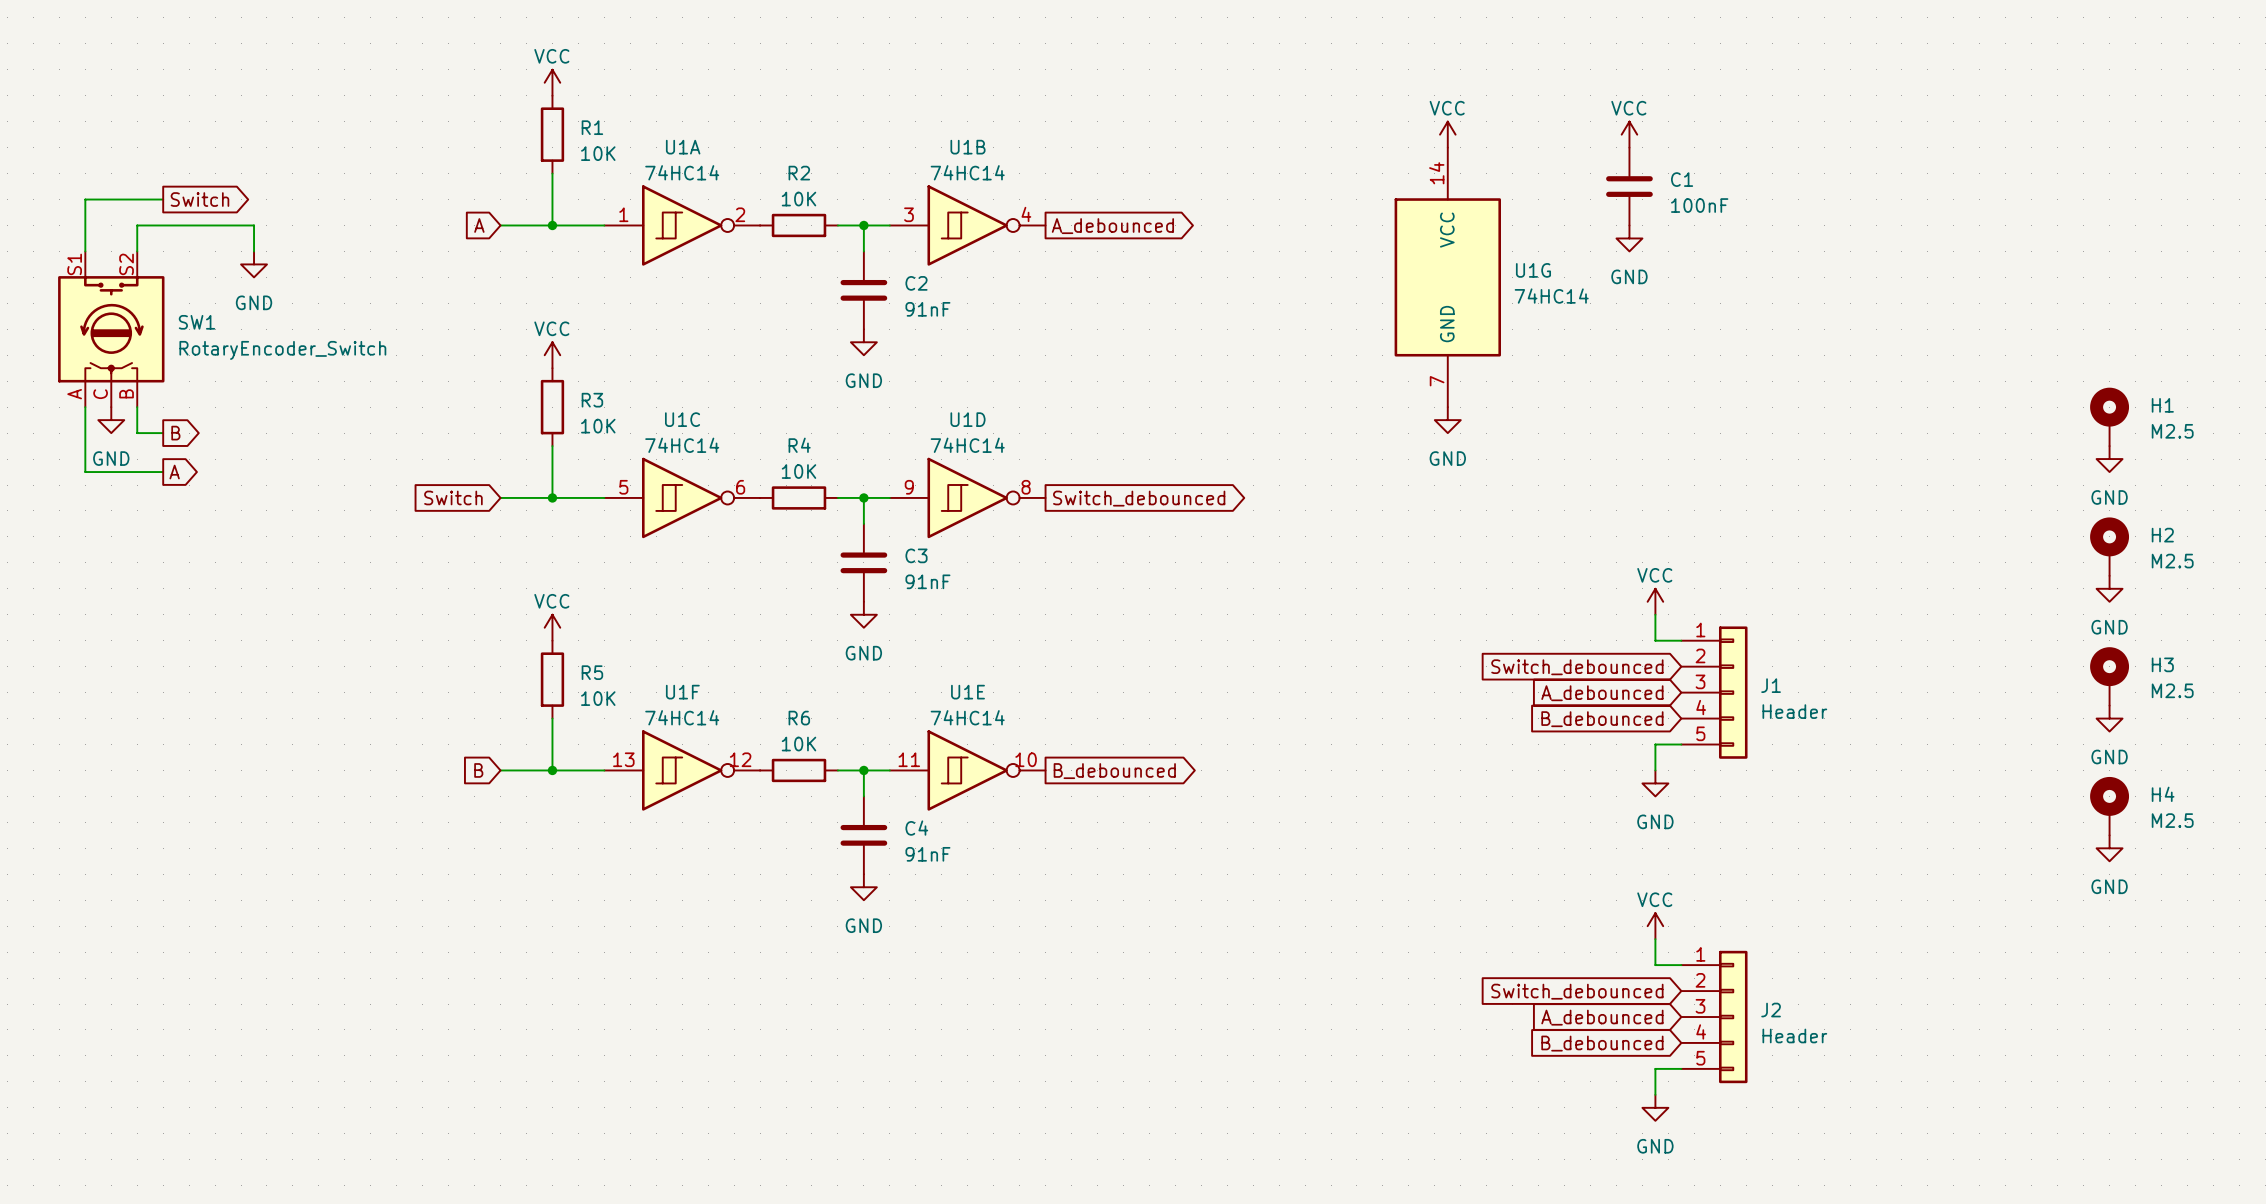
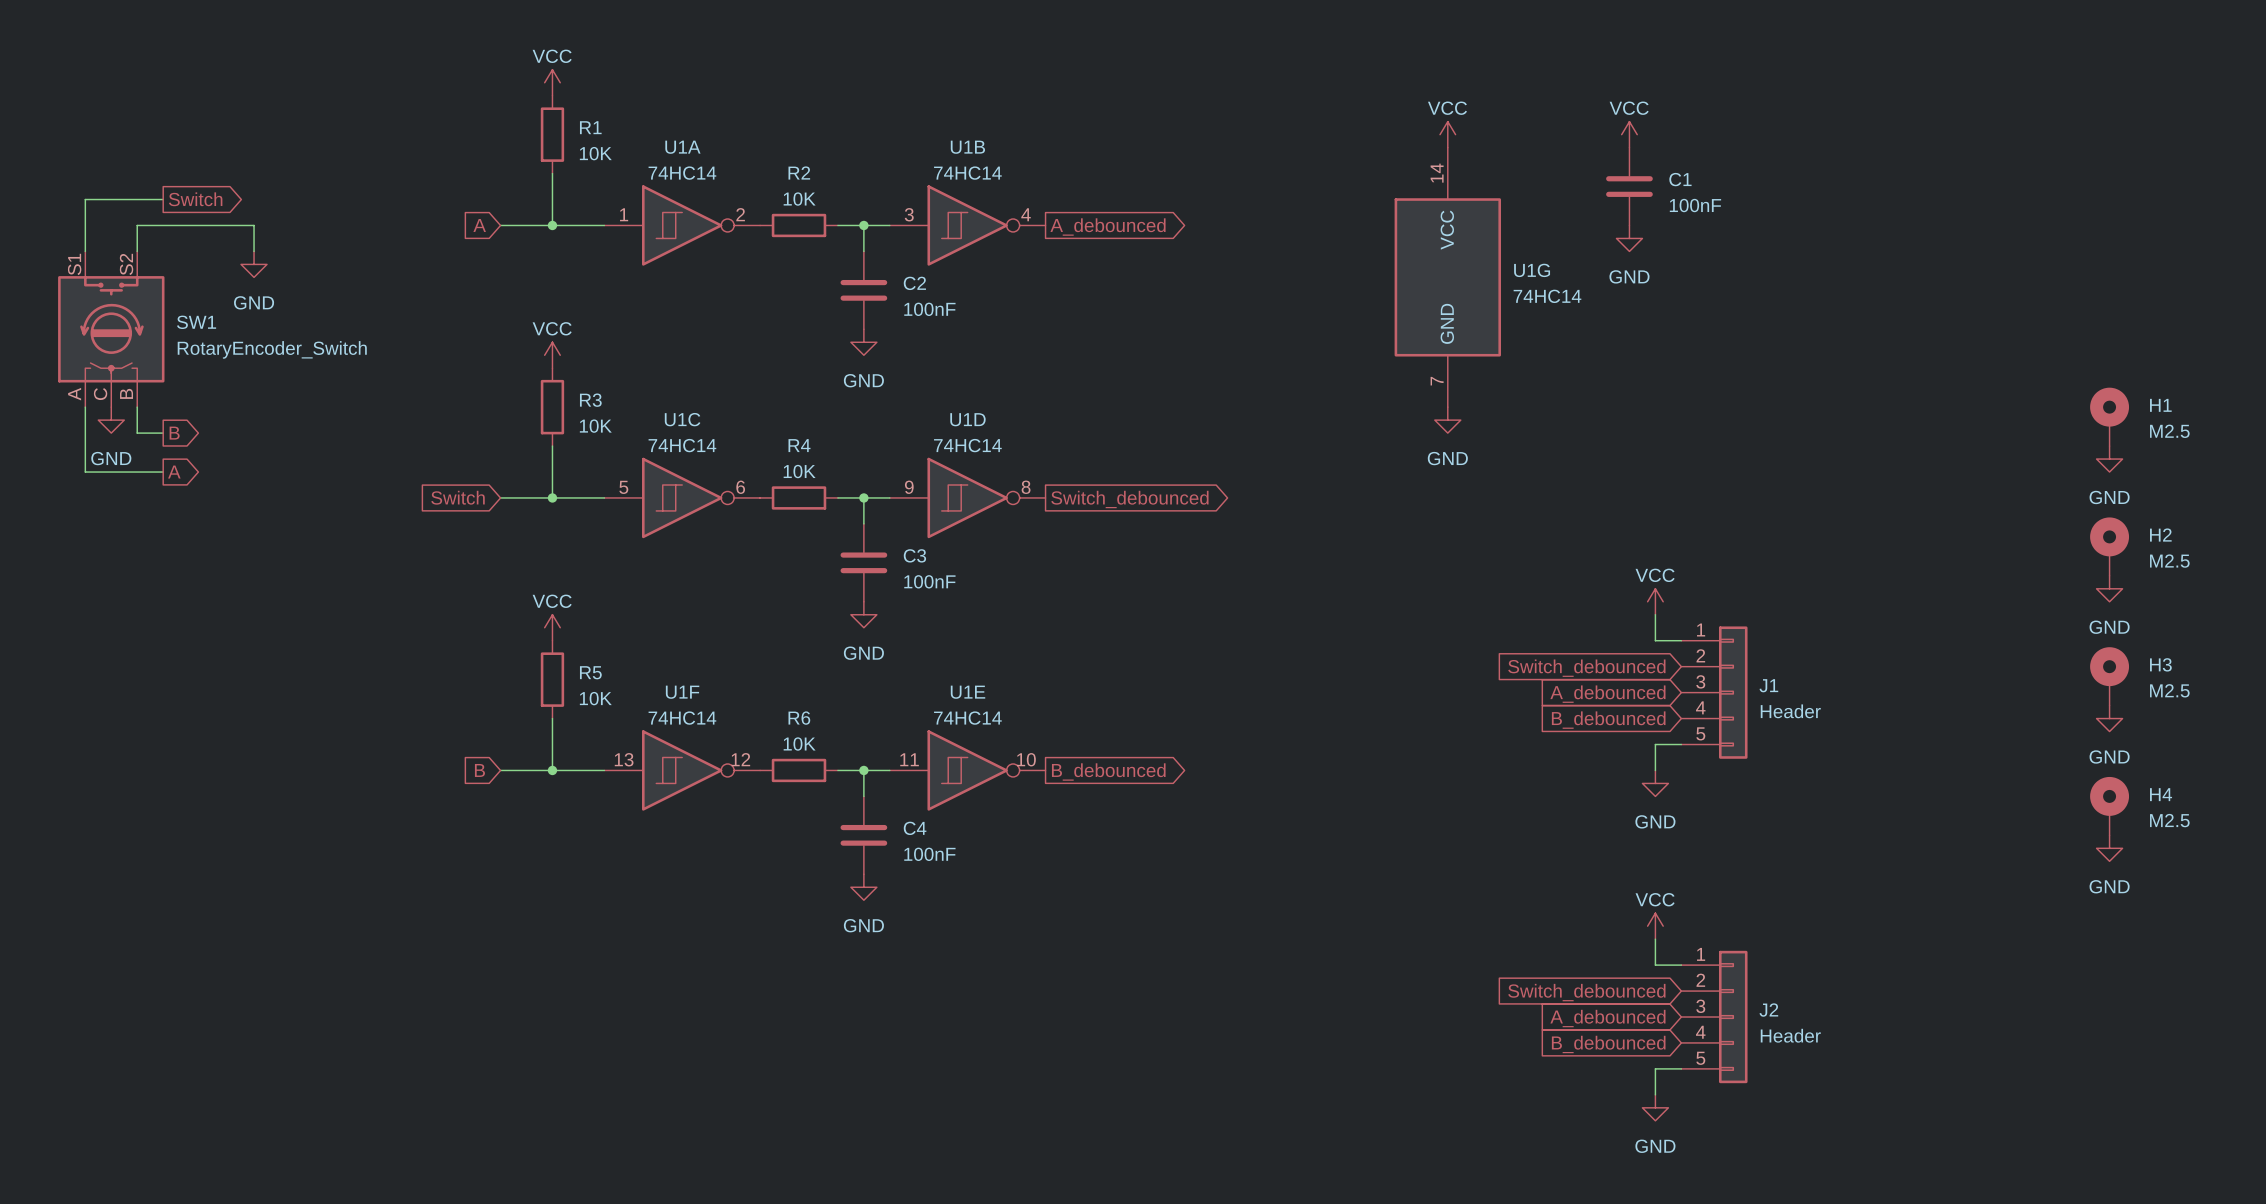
C2 value: 91nF (927, 309) -> 100nF (929, 309)
C3 value: 91nF (927, 581) -> 100nF (929, 581)
C4 value: 91nF (927, 854) -> 100nF (929, 854)

